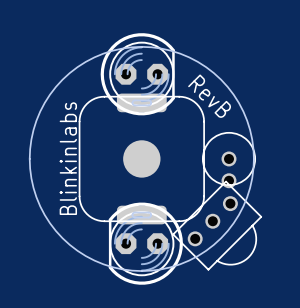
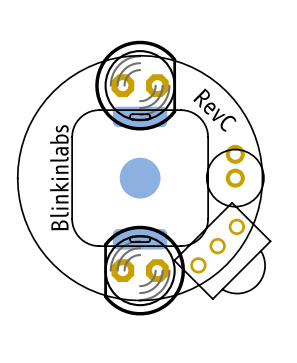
text: RevB (209, 96) -> RevC (214, 110)
part footprint: [202, 132, 256, 189] -> [205, 144, 265, 208]

